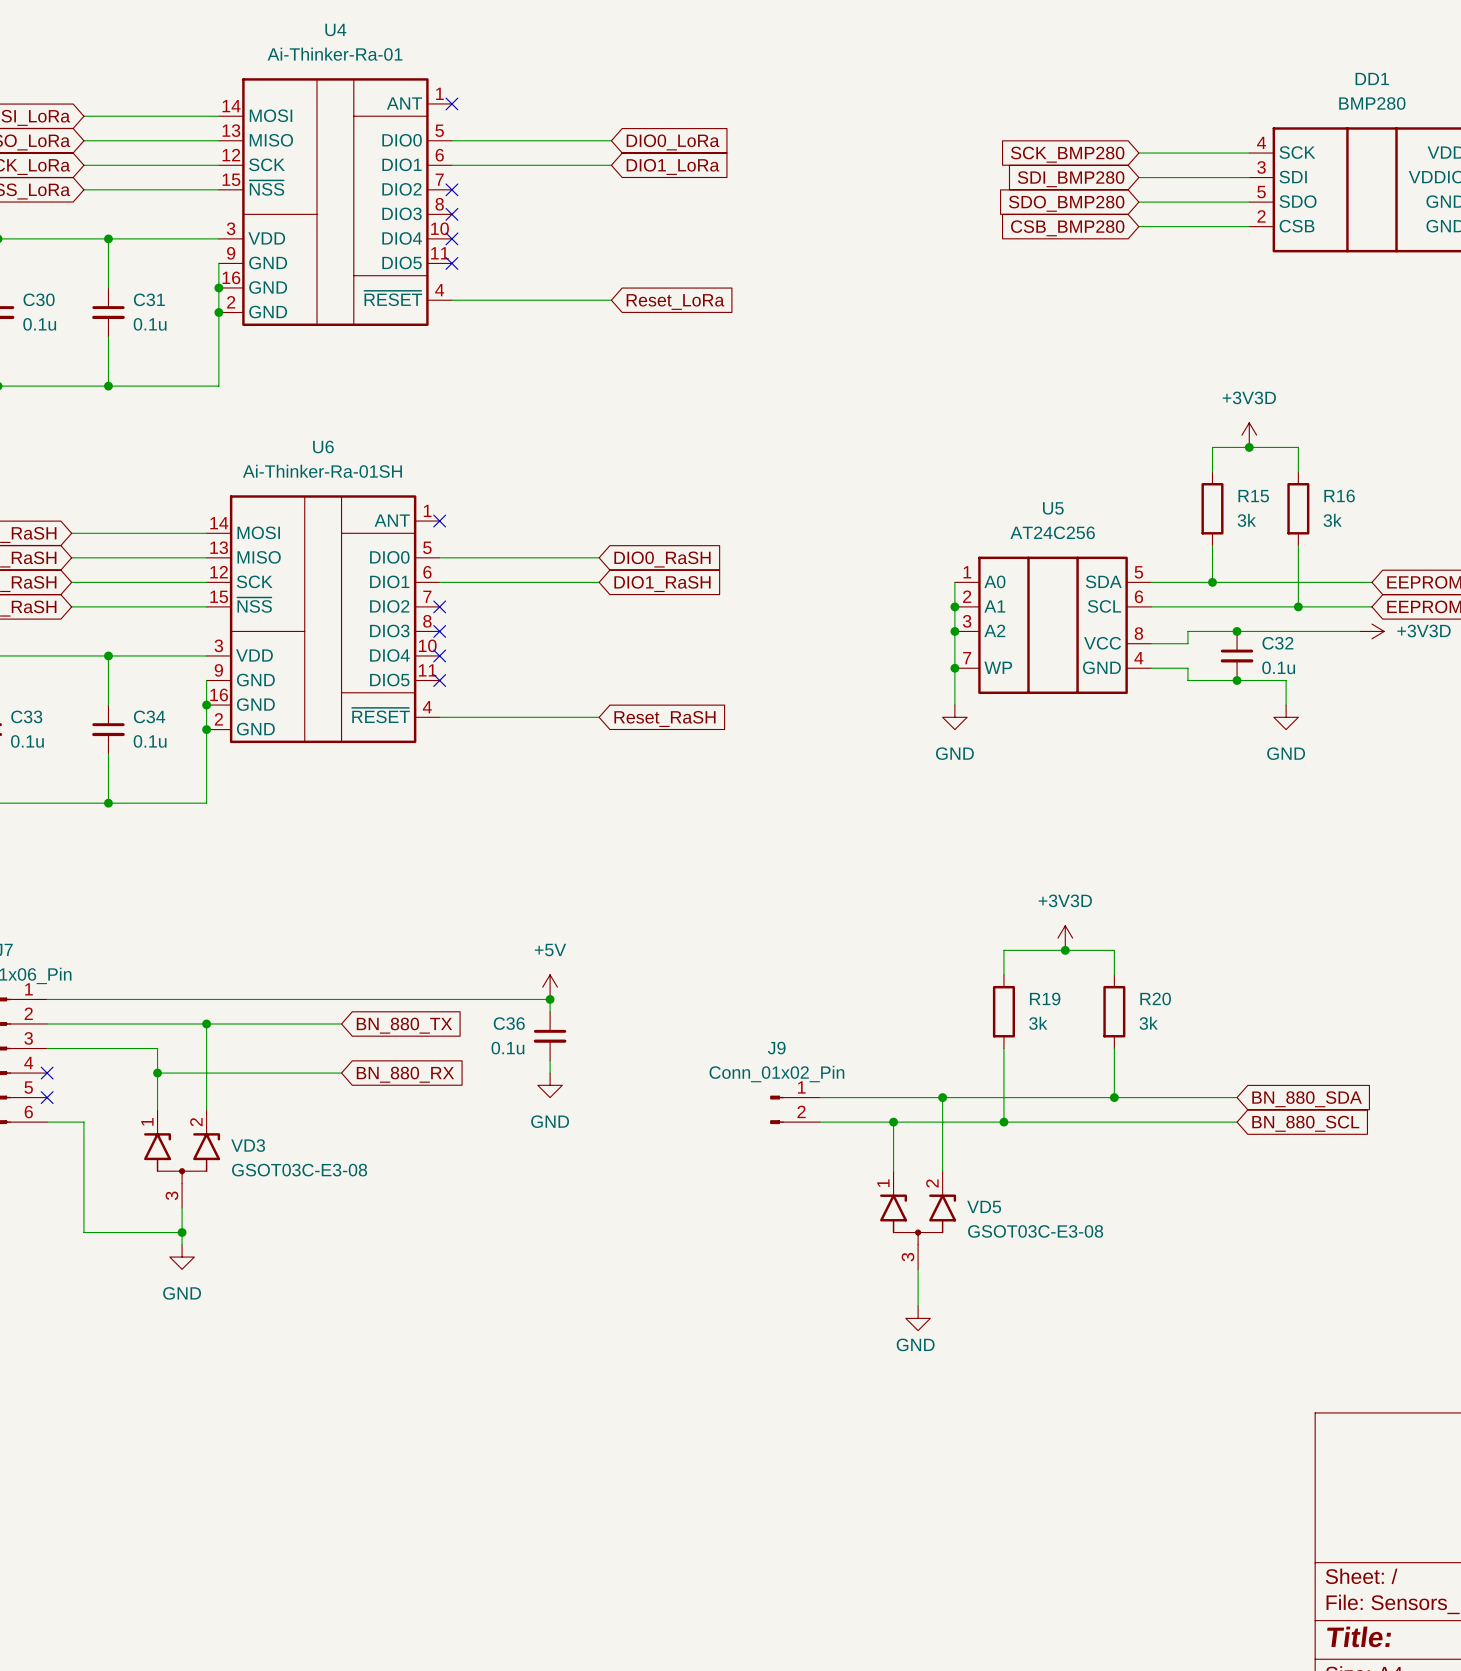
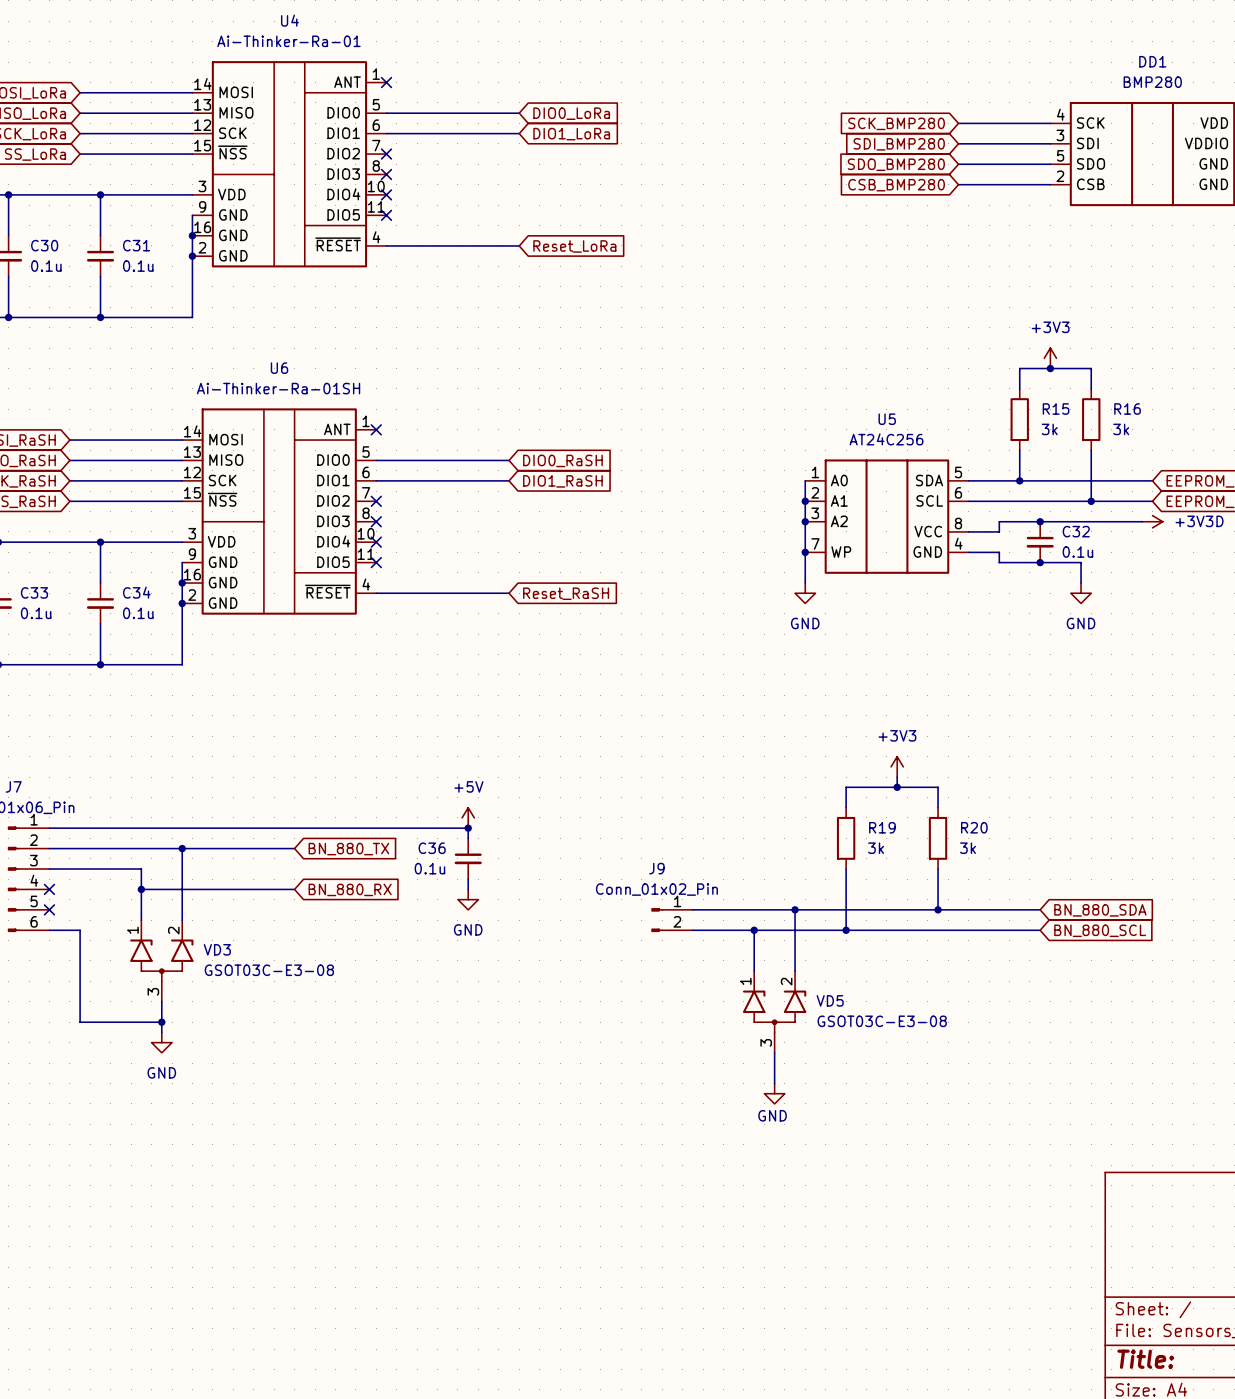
power symbol: +3V3D (1249, 435) -> +3V3 (1050, 358)
power symbol: none -> +3V3 (897, 766)
power symbol: +3V3D (1065, 938) -> none

